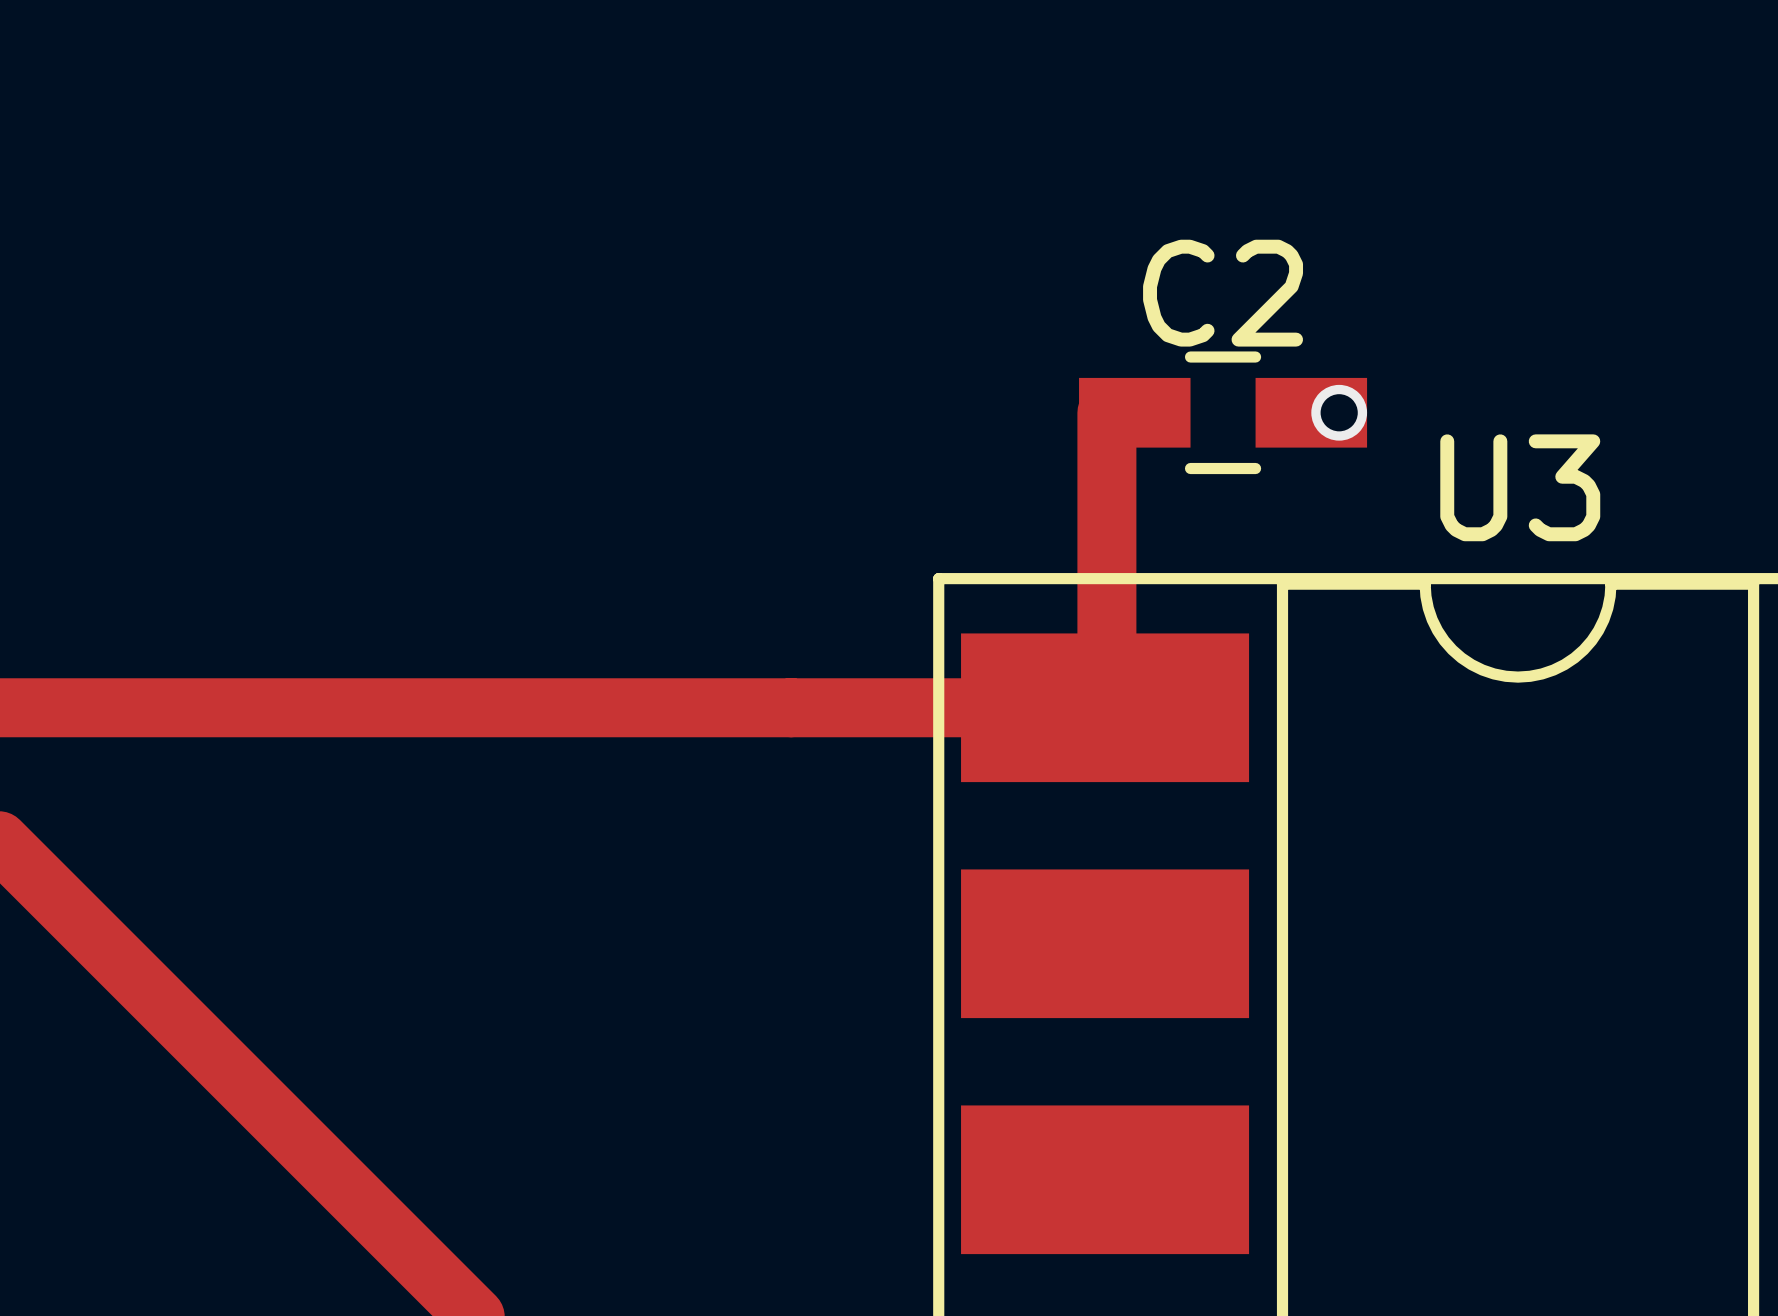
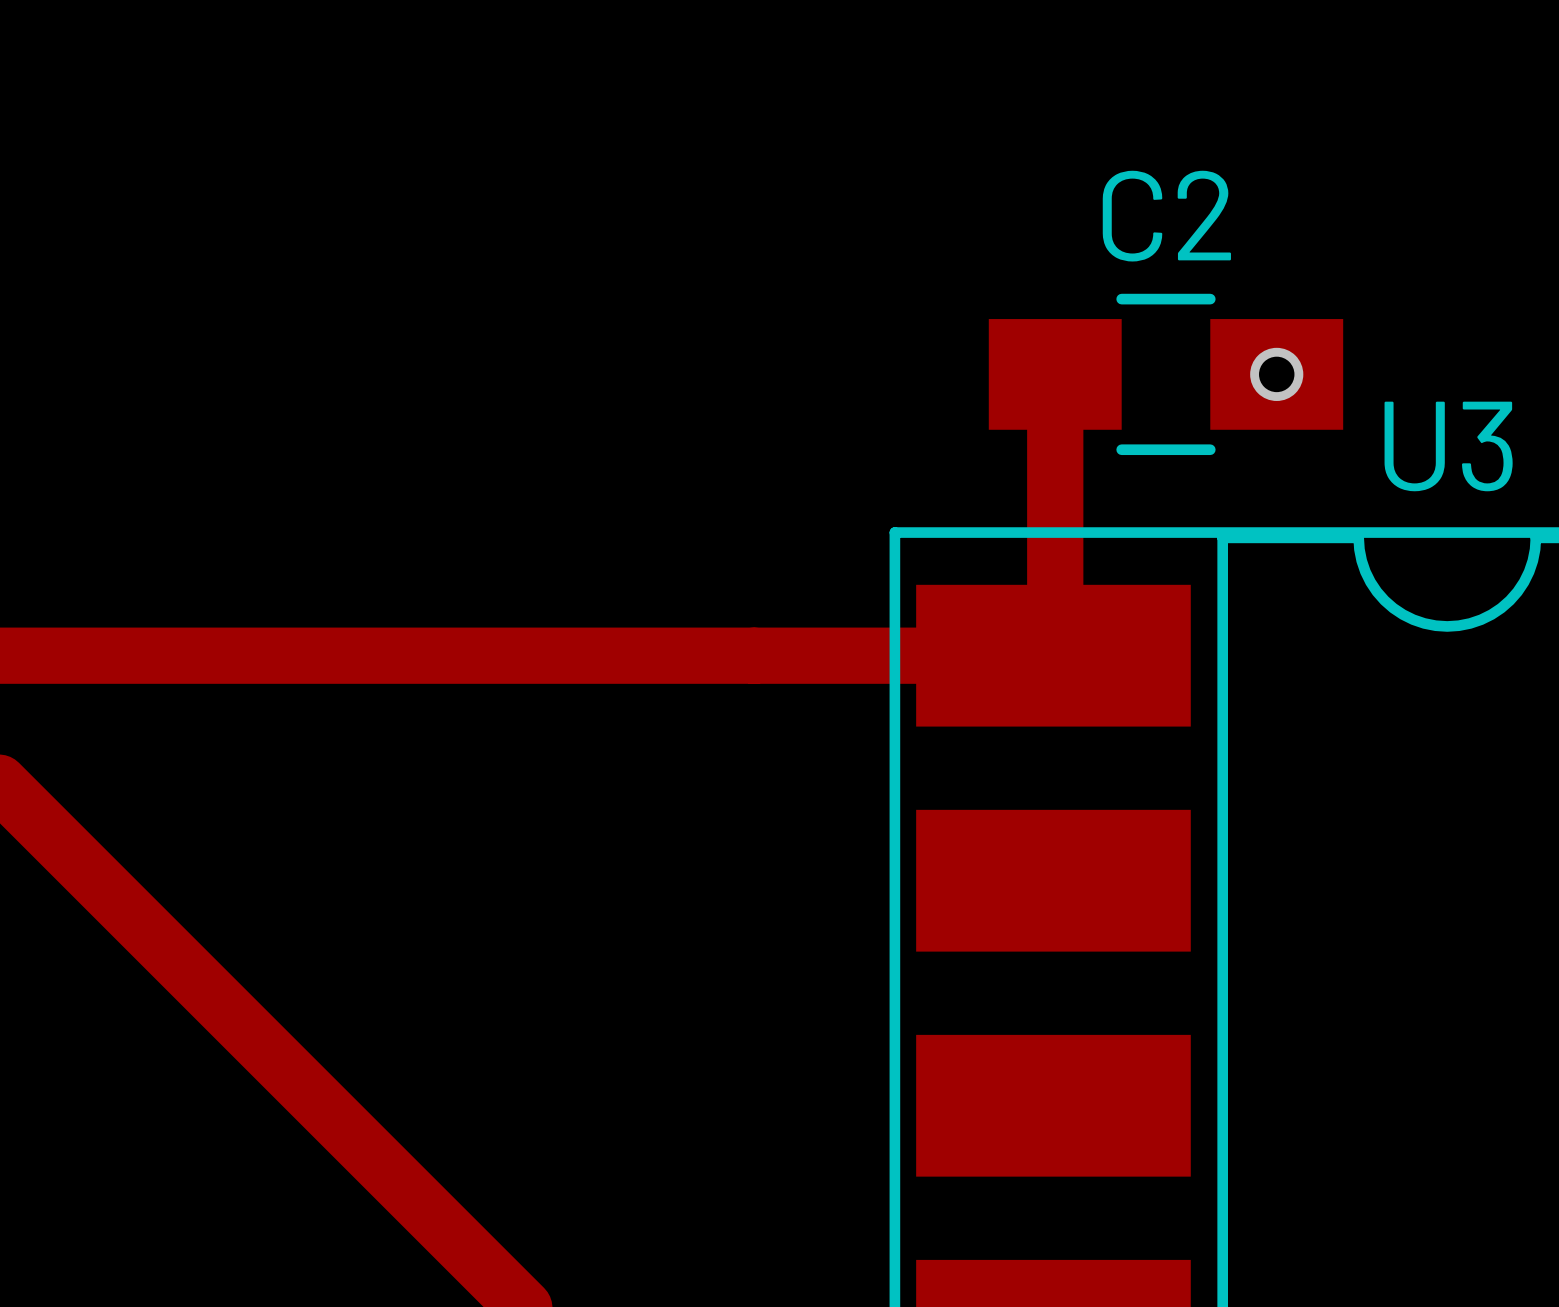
C2 name position: C2 (1223, 293) -> C2 (1166, 216)
C2 footprint: [1079, 351, 1368, 475] -> [988, 293, 1344, 456]

